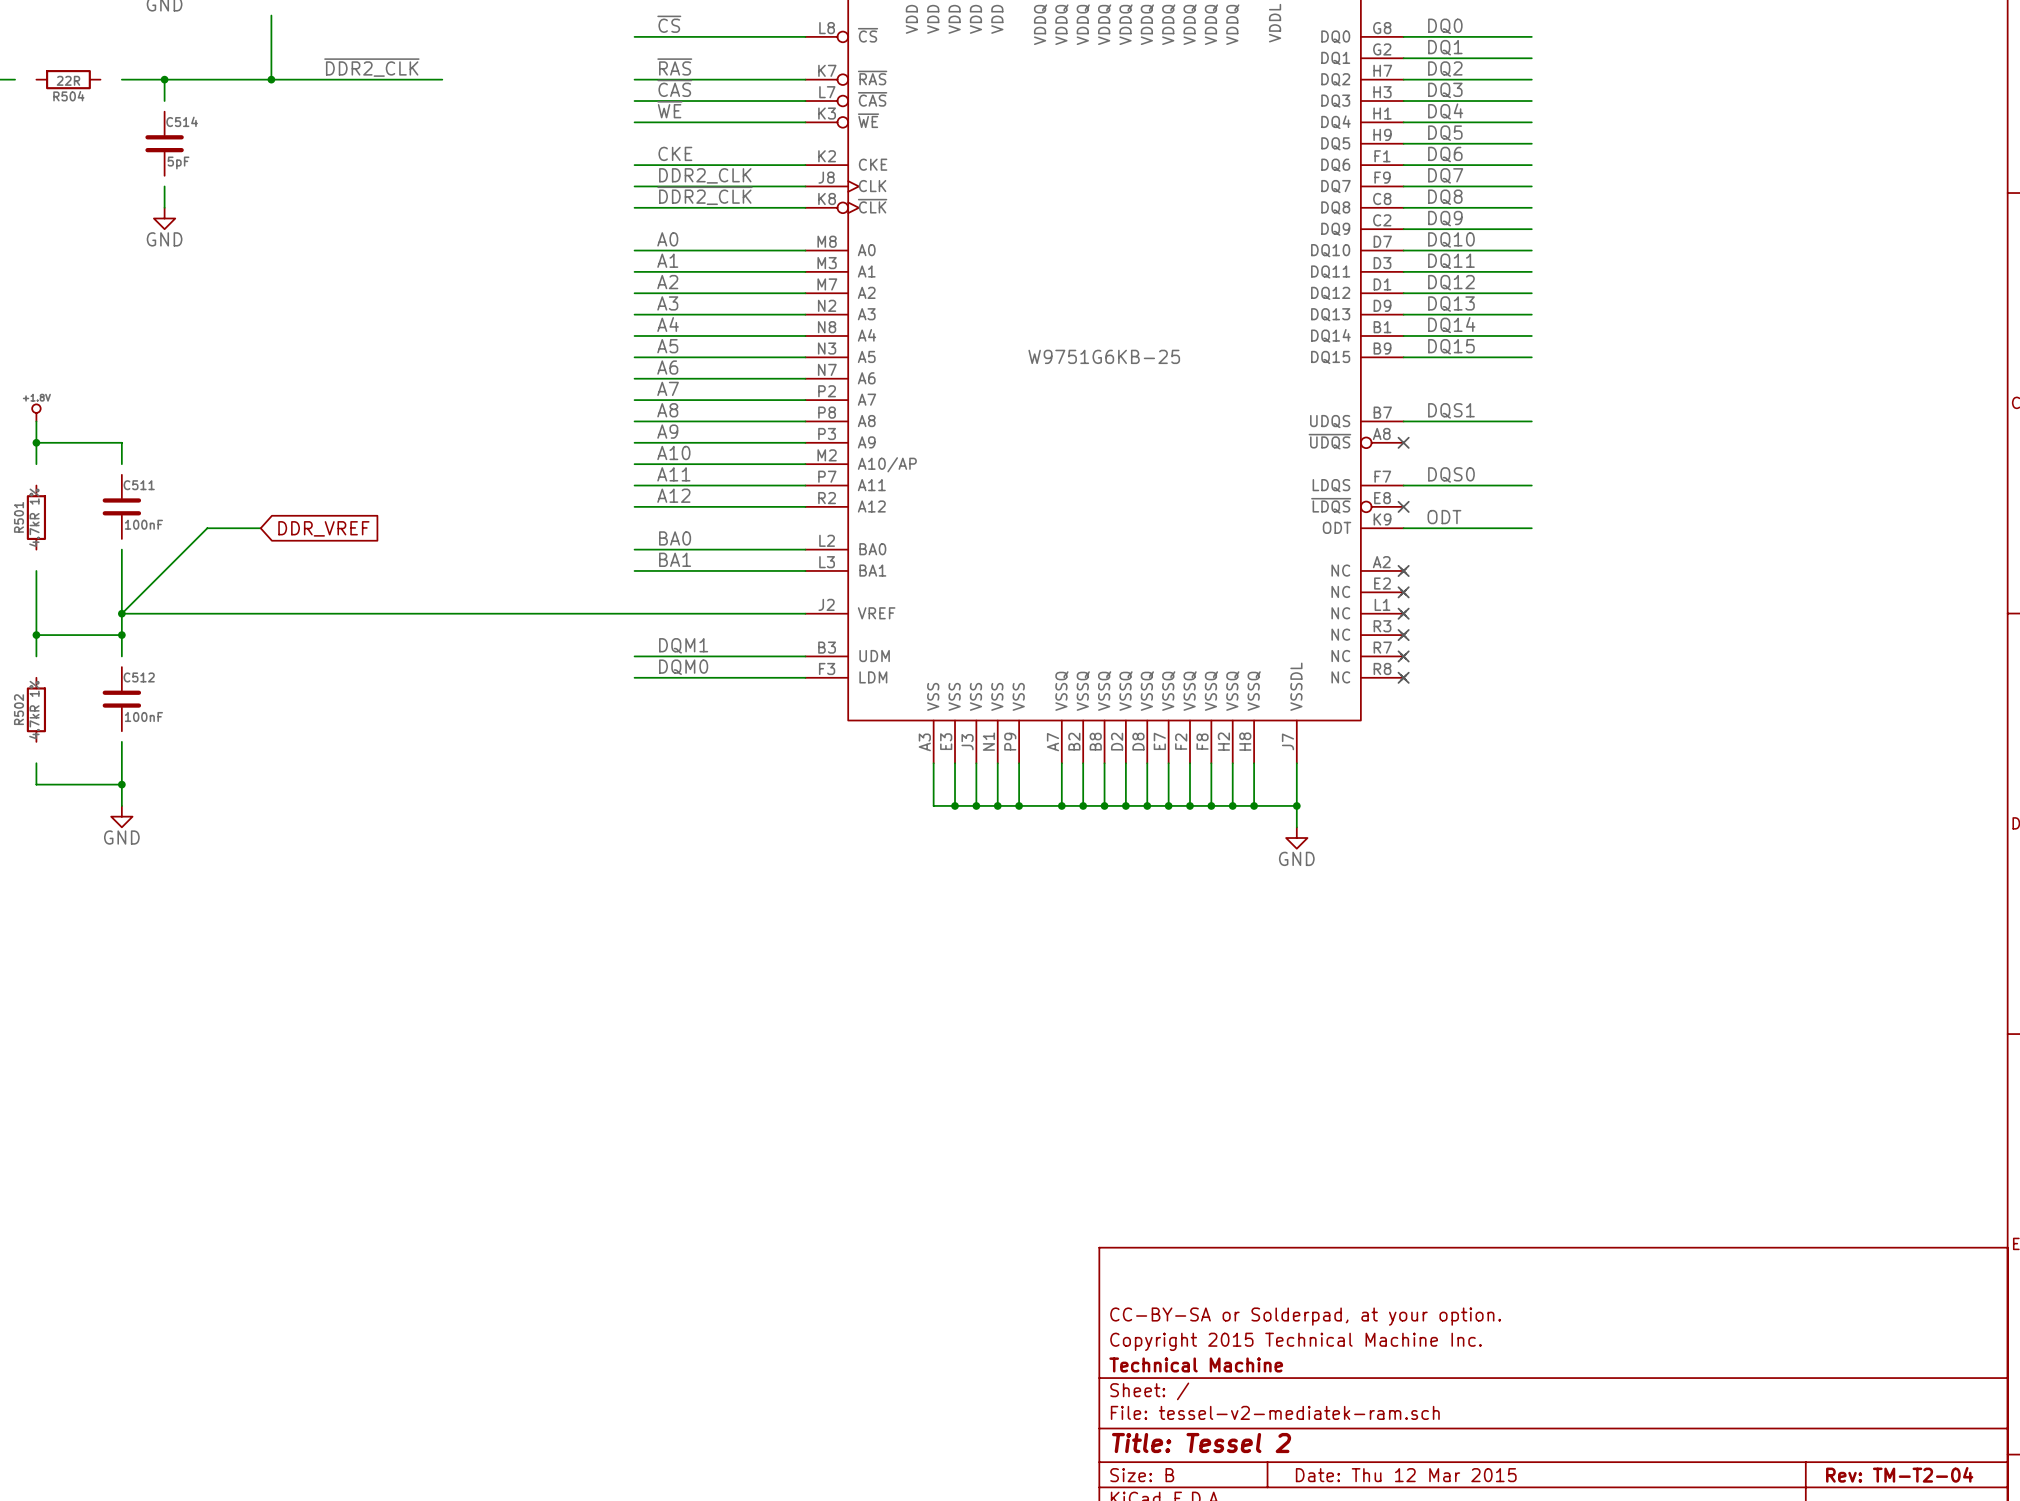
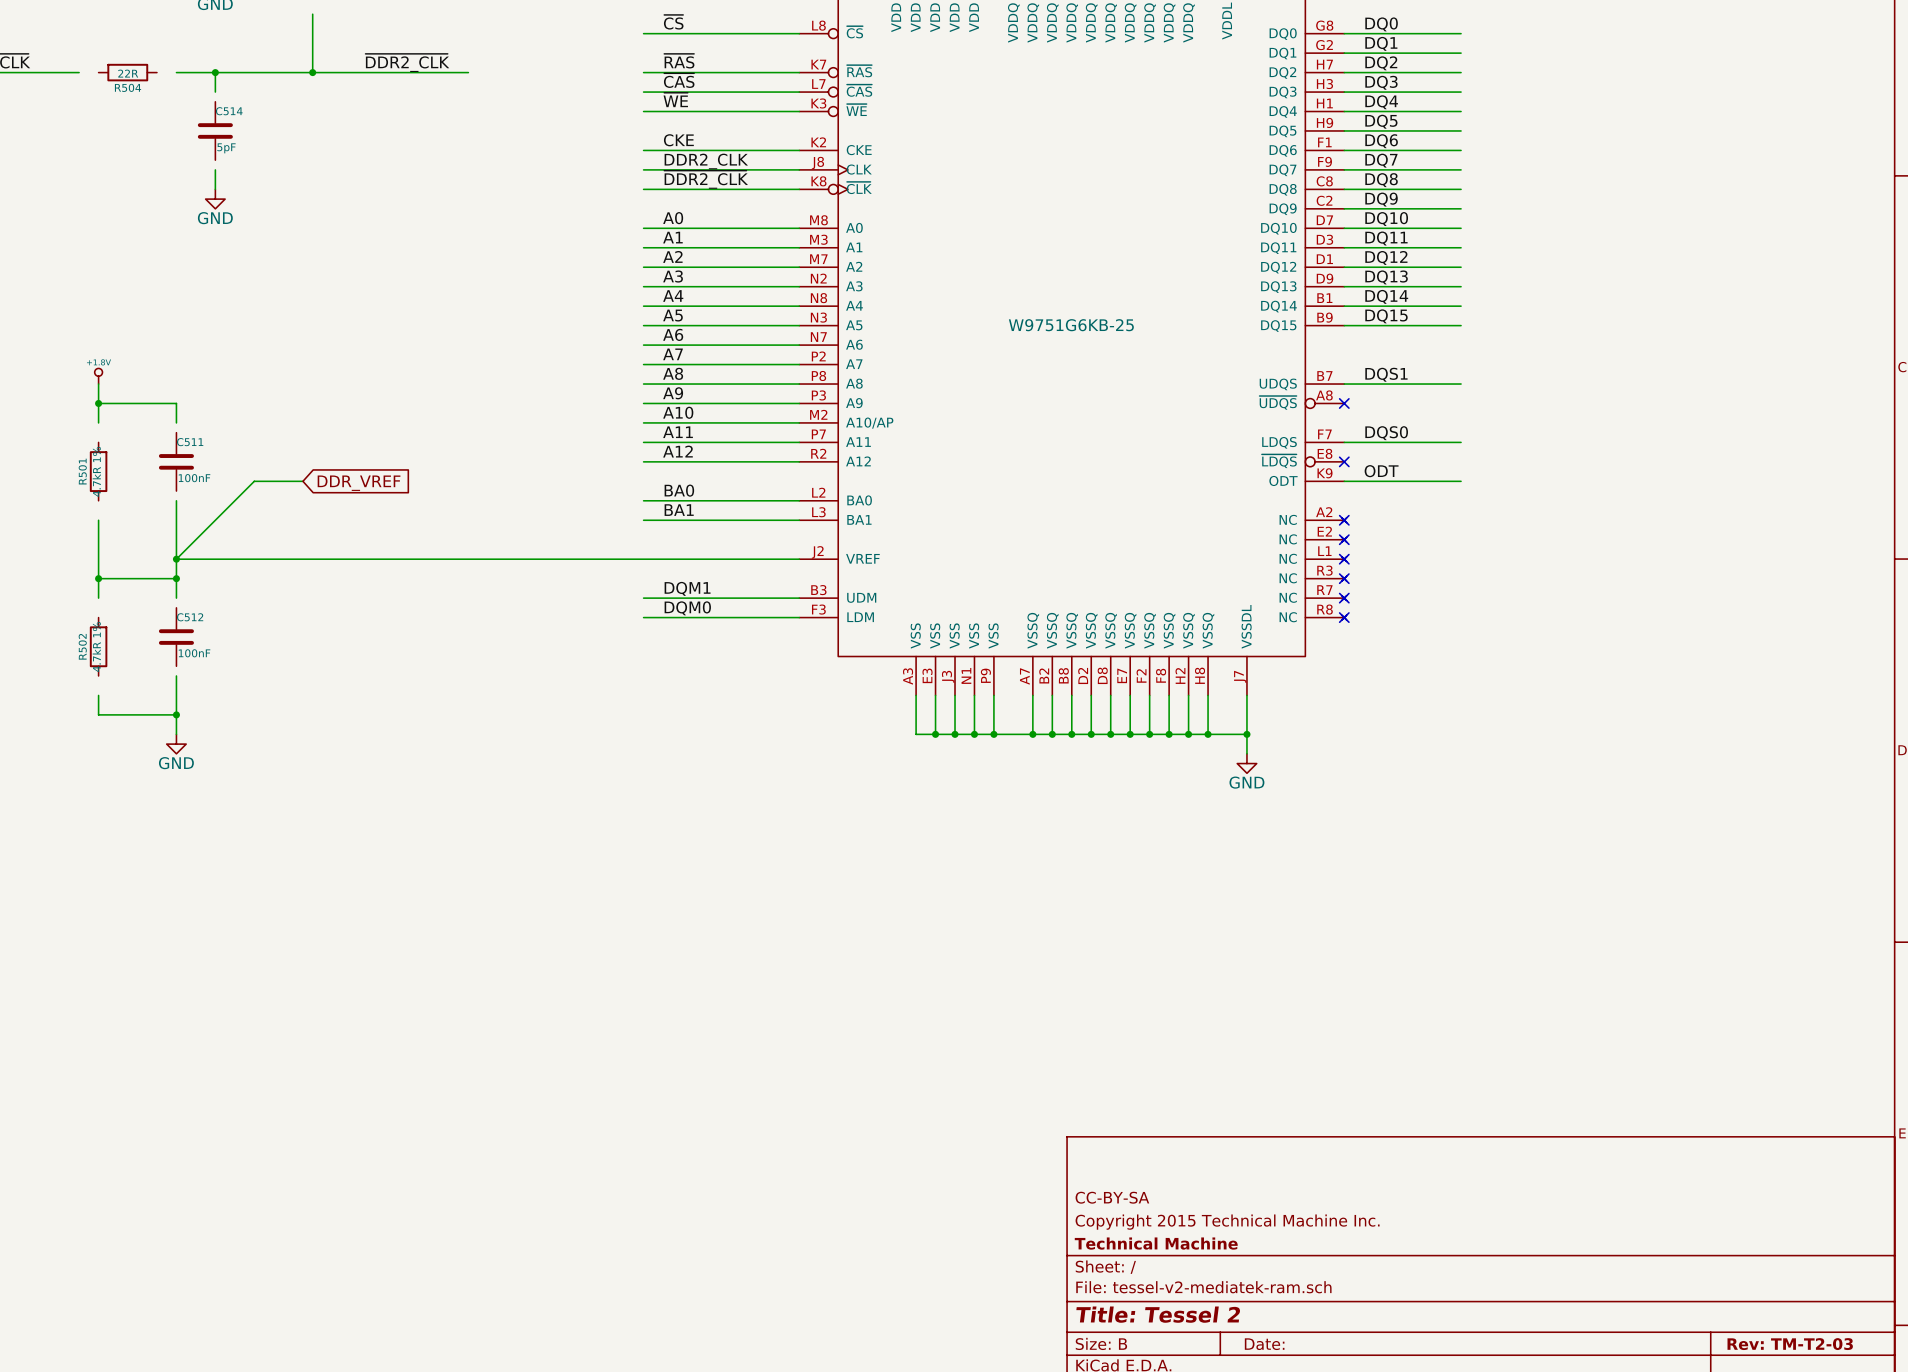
title block: CC-BY-SA or Solderpad, at your option. (1305, 1316) -> CC-BY-SA (1112, 1197)
title block: Rev: TM-T2-04 (1899, 1474) -> Rev: TM-T2-03 (1790, 1344)
title block: Date: Thu 12 Mar 2015 (1406, 1475) -> Date: (1264, 1344)

